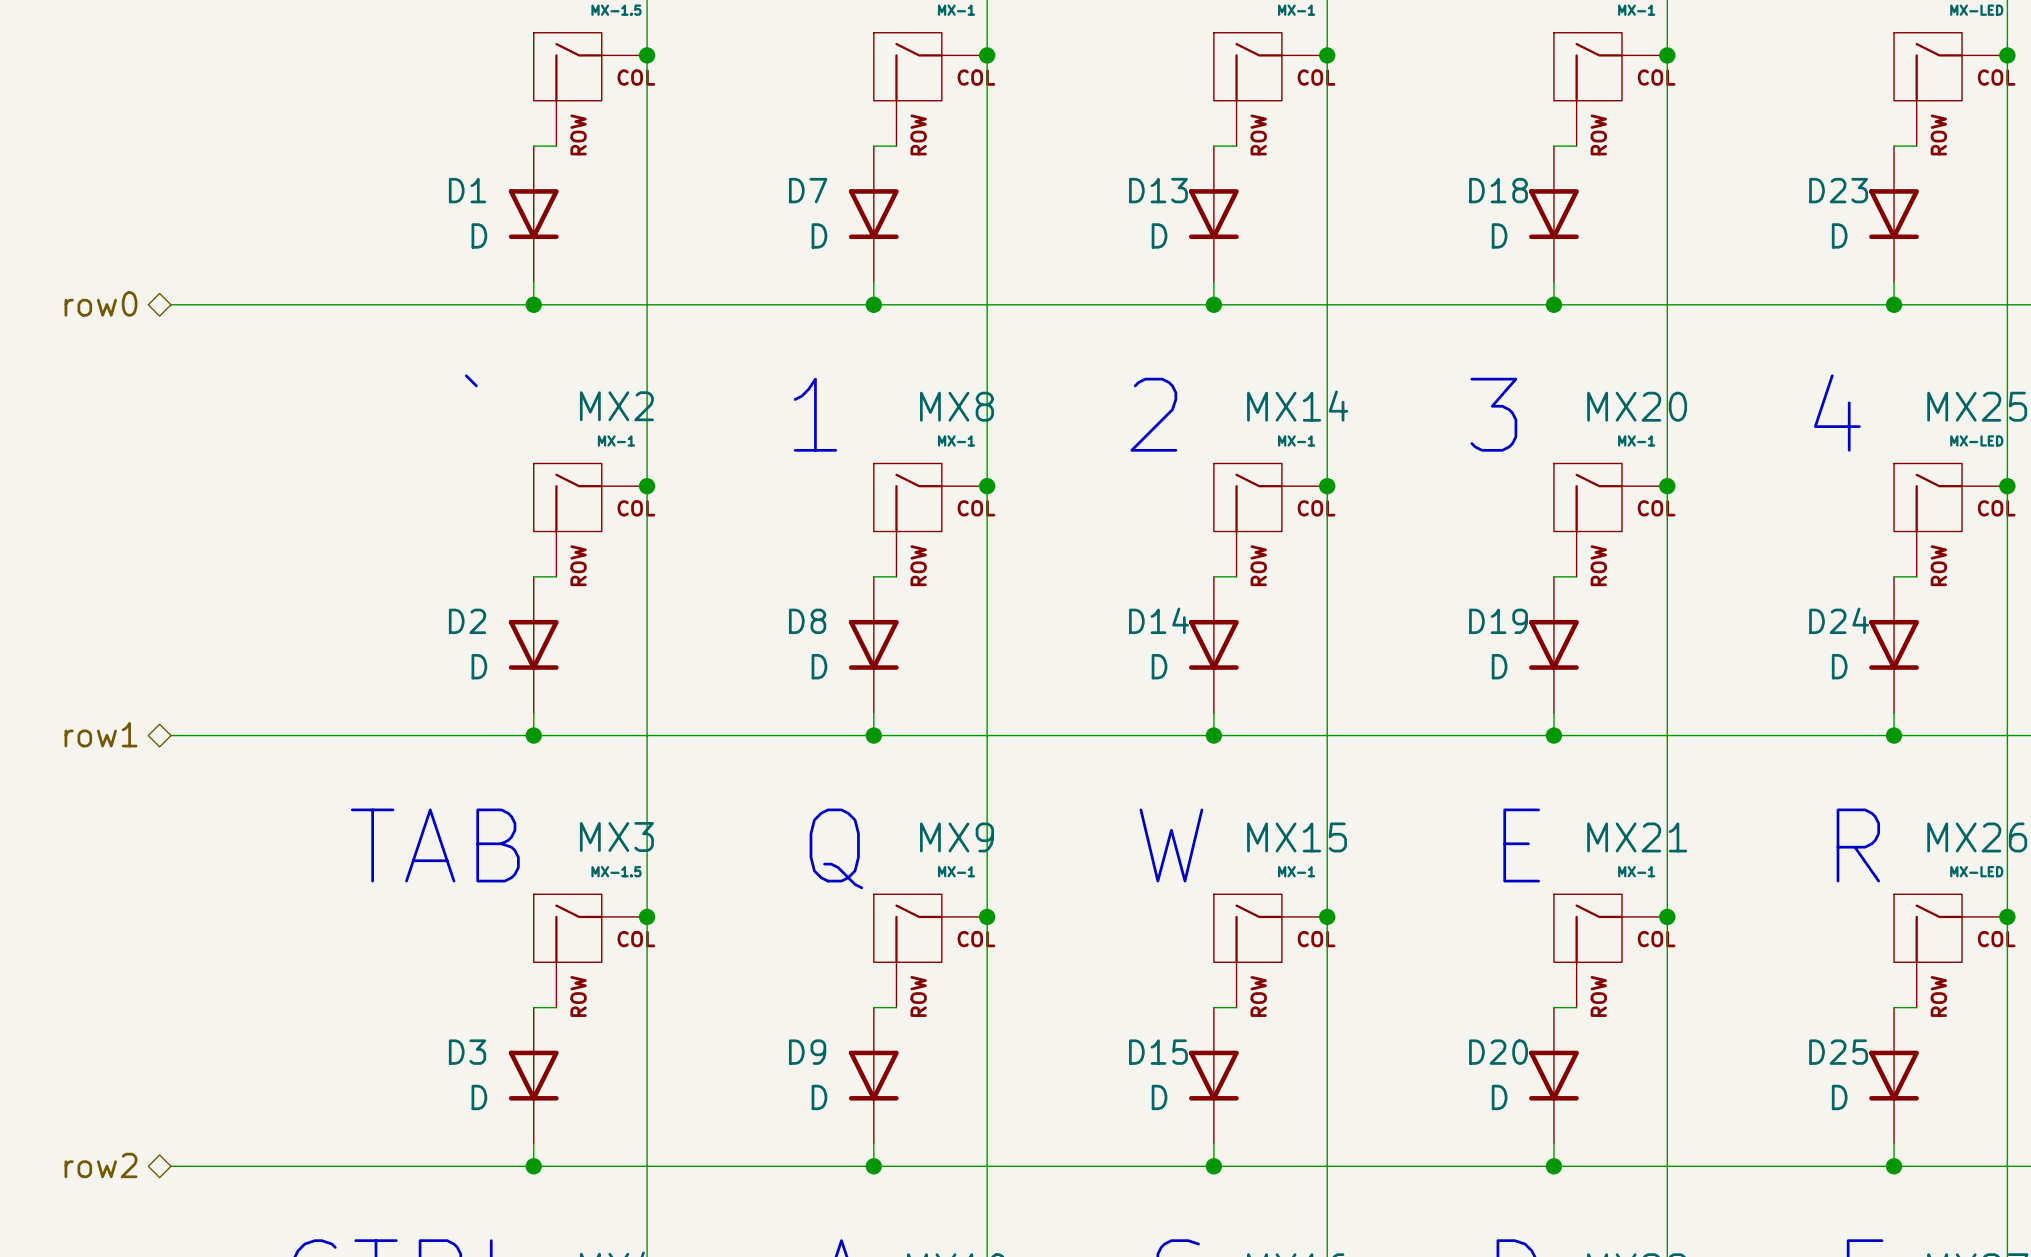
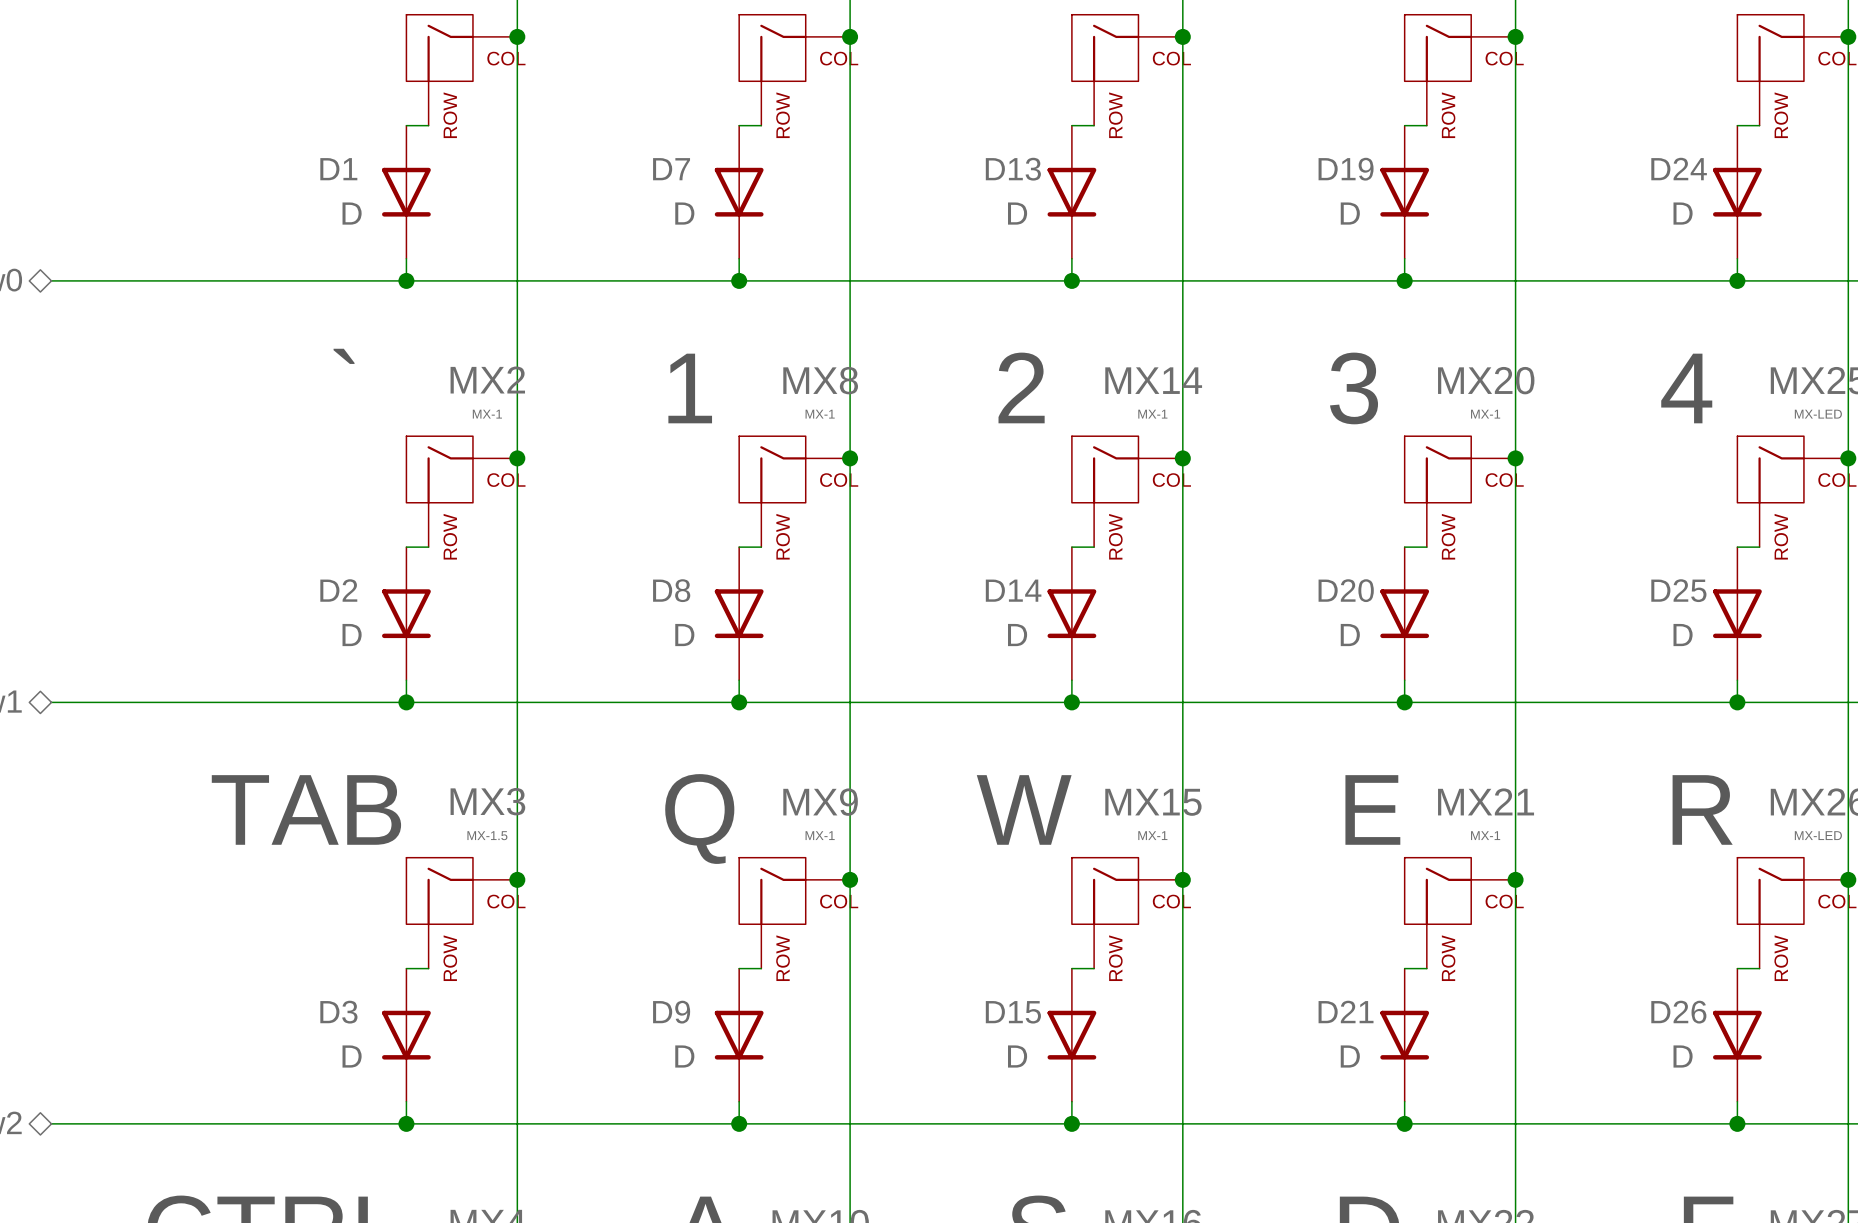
D18 name: D18 (1498, 190) -> D19 (1346, 169)
D23 name: D23 (1838, 190) -> D24 (1679, 169)
D24 name: D24 (1839, 620) -> D25 (1678, 590)
D19 name: D19 (1498, 621) -> D20 (1346, 590)
D20 name: D20 (1498, 1052) -> D21 (1346, 1011)
D25 name: D25 (1838, 1052) -> D26 (1678, 1012)

